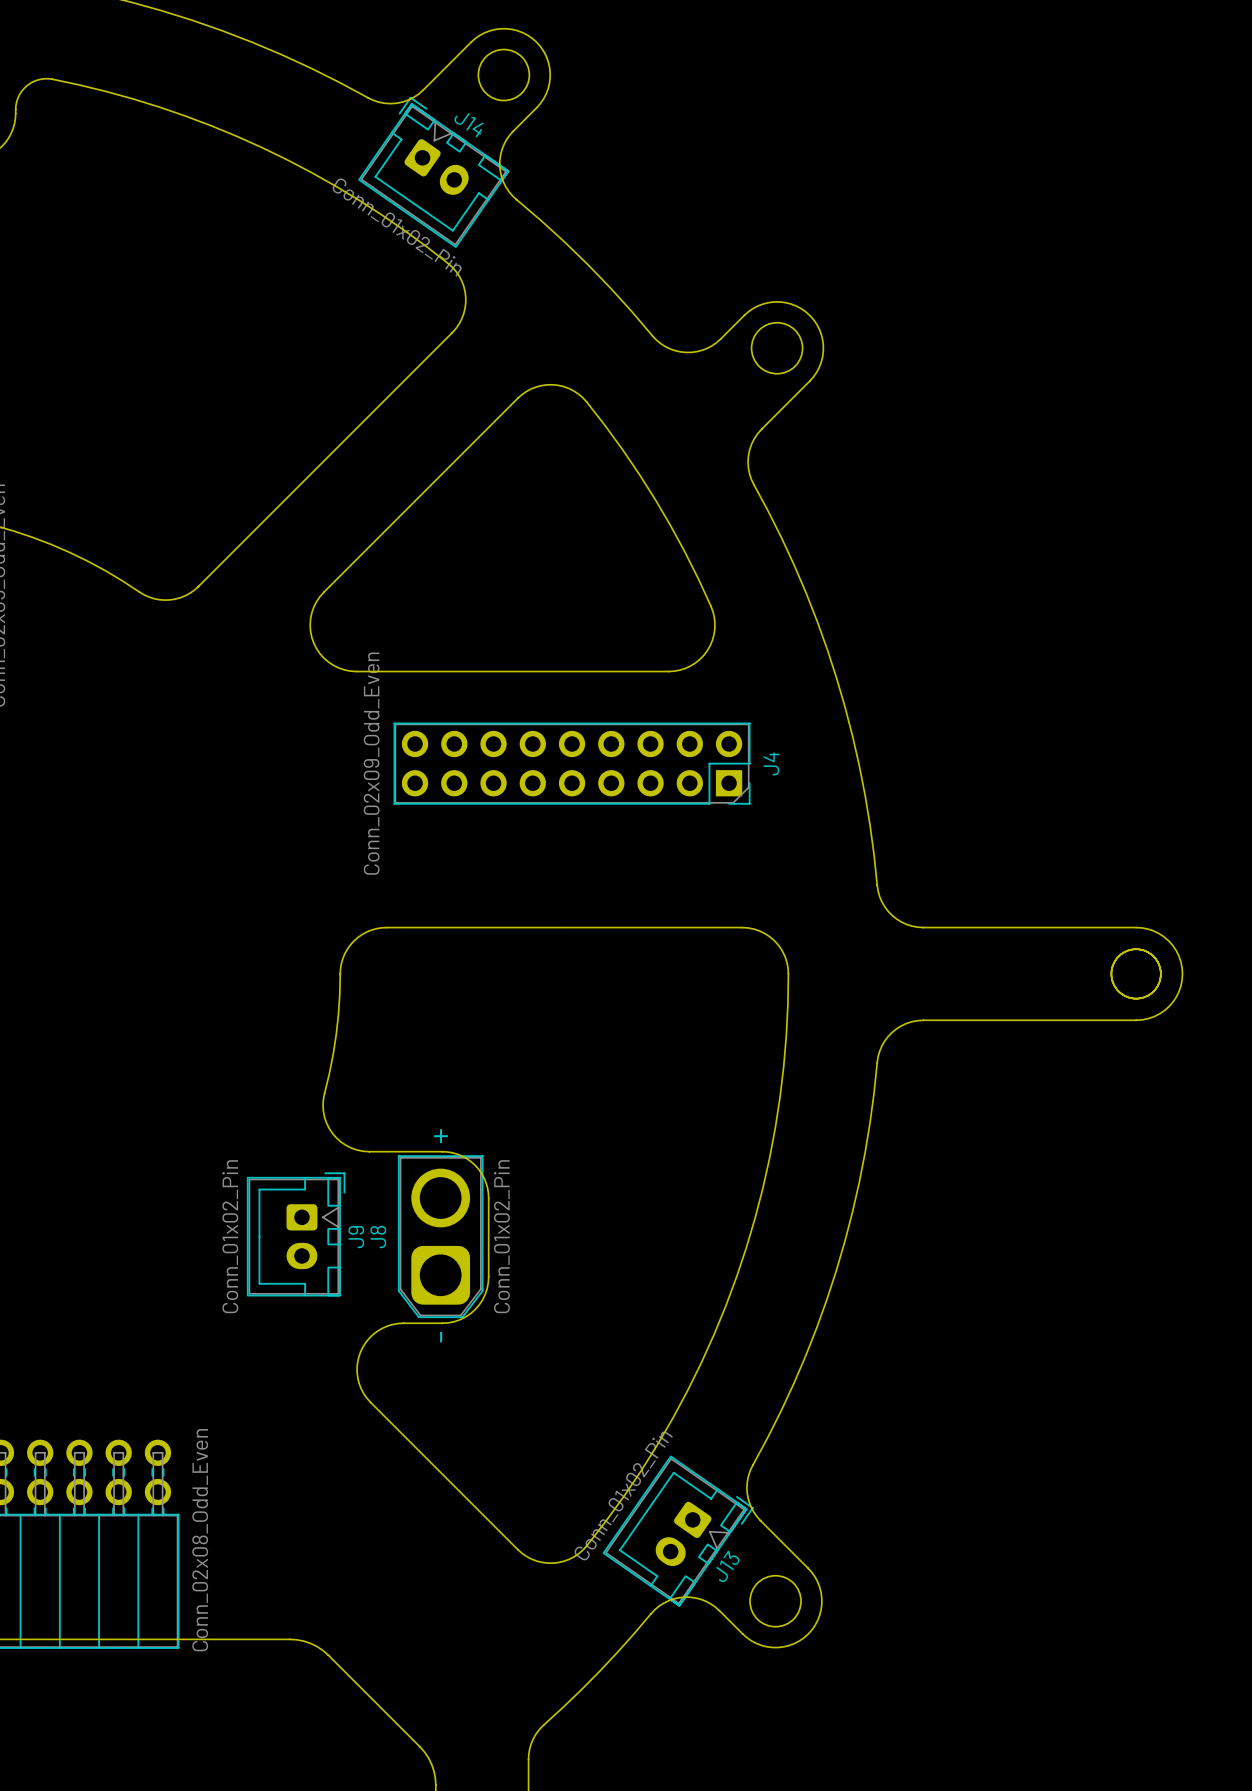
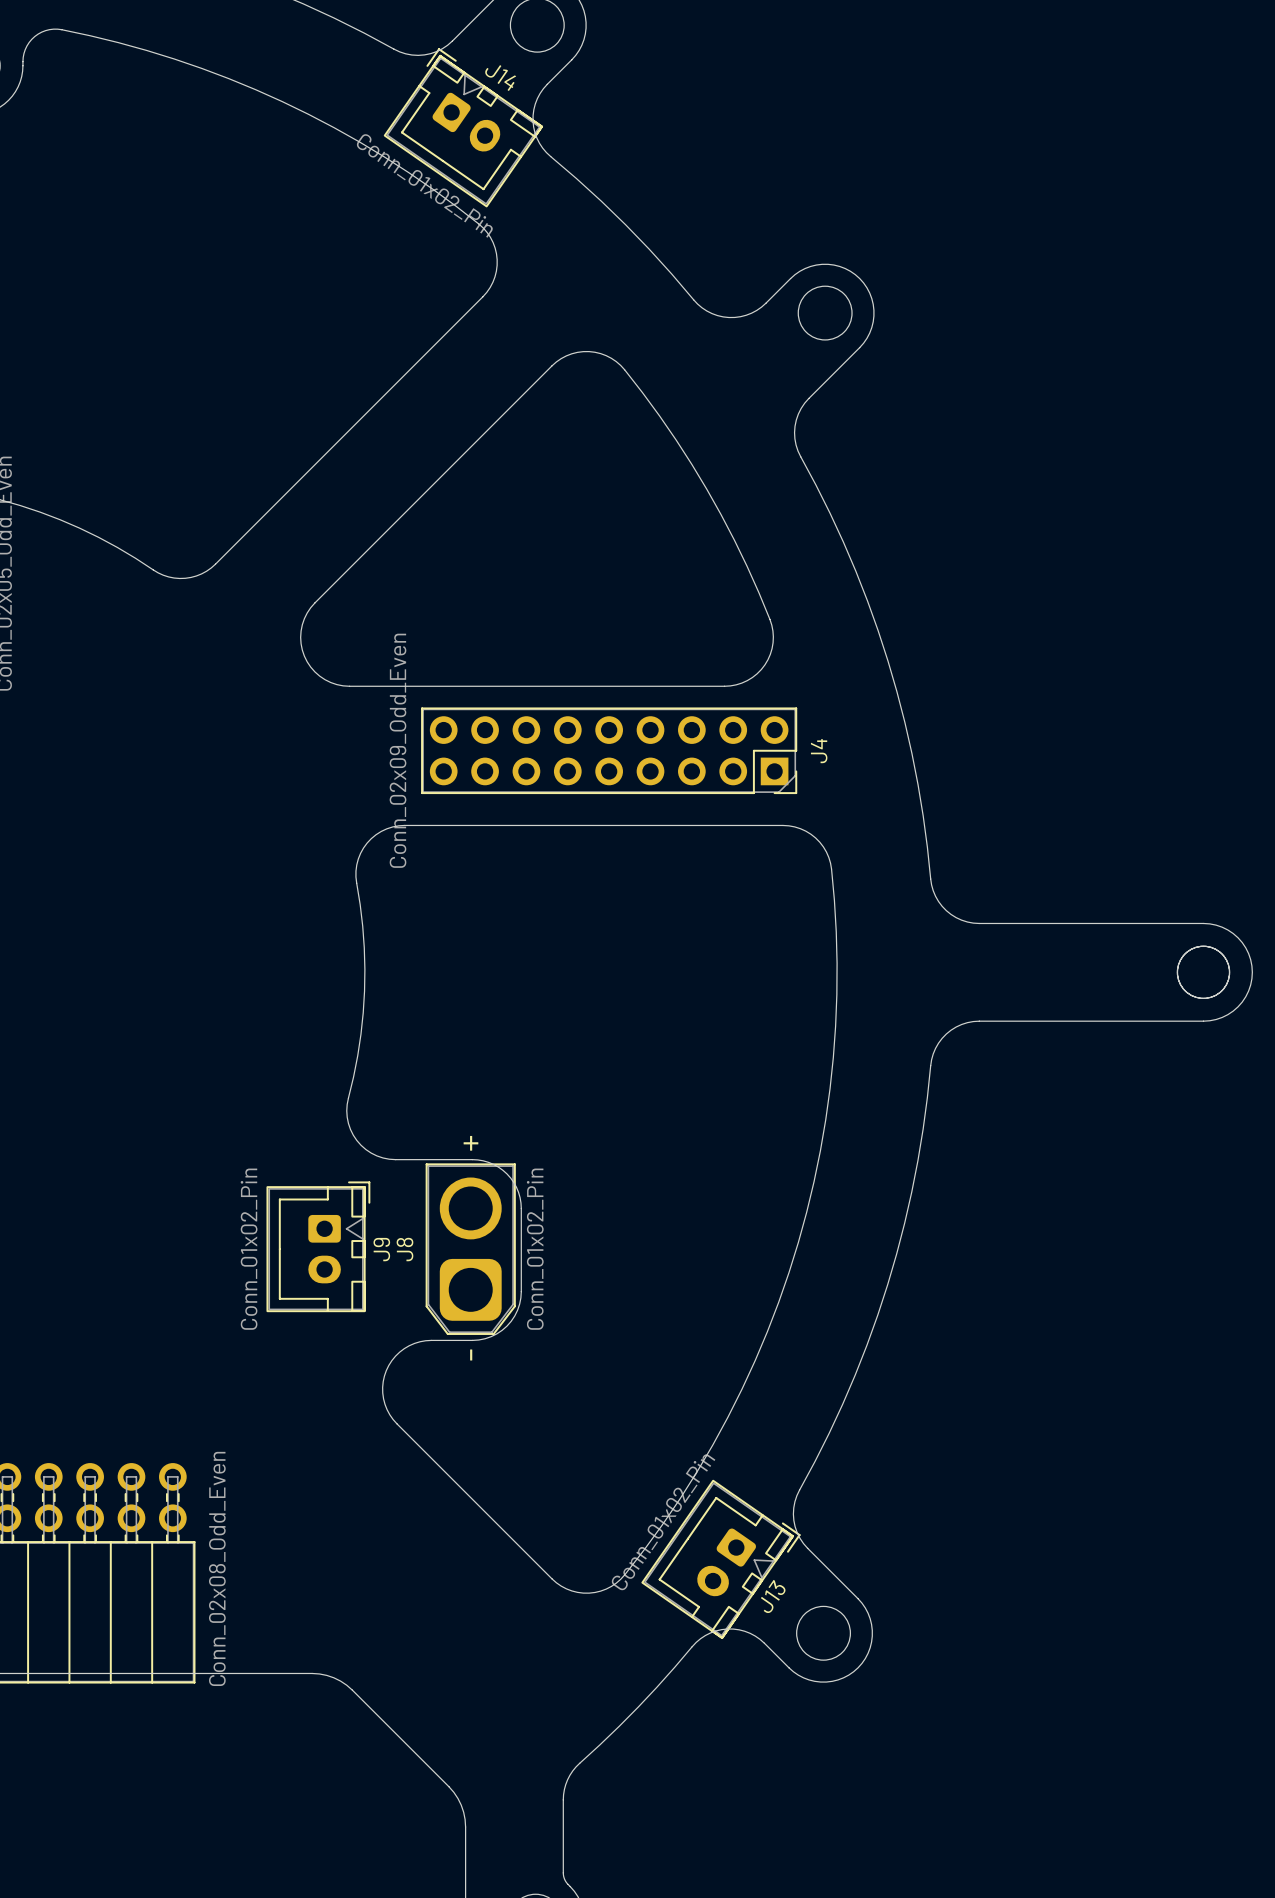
board edge: (517, 398) (531, 388) (542, 385) (553, 384) (569, 388) (586, 402) (622, 449) (670, 526) (711, 606) (714, 623) (714, 634) (707, 650) (700, 659) (685, 668) (668, 671) (350, 671) (338, 667) (328, 661) (319, 653) (313, 642) (310, 631) (310, 619) (313, 607) (323, 592) -> (552, 365) (566, 355) (583, 351) (594, 352) (611, 358) (624, 369) (676, 439) (720, 514) (747, 566) (769, 619) (773, 636) (772, 648) (767, 659) (757, 673) (741, 683) (724, 686) (349, 686) (336, 684) (319, 676) (307, 661) (301, 643) (301, 631) (304, 618) (310, 607) (347, 570)
board edge: (324, 1093) (336, 1034) (341, 963) (350, 945) (361, 934) (371, 930) (386, 927) (742, 927) (759, 931) (770, 937) (778, 945) (784, 956) (788, 973) (786, 1035) (775, 1127) (762, 1188) (746, 1247) (714, 1334) (687, 1390) (657, 1444) (623, 1496) (582, 1550) (569, 1559) (553, 1563) (536, 1561) (517, 1549) -> (348, 1098) (357, 1055) (364, 991) (364, 947) (355, 871) (358, 859) (363, 848) (371, 838) (381, 831) (392, 826) (404, 825) (782, 825) (805, 831) (815, 837) (826, 852) (831, 869) (837, 963) (835, 1026) (830, 1088) (814, 1181) (798, 1242) (778, 1302) (755, 1360) (712, 1445) (662, 1524) (624, 1575) (606, 1589) (589, 1593) (566, 1588) (552, 1578)

